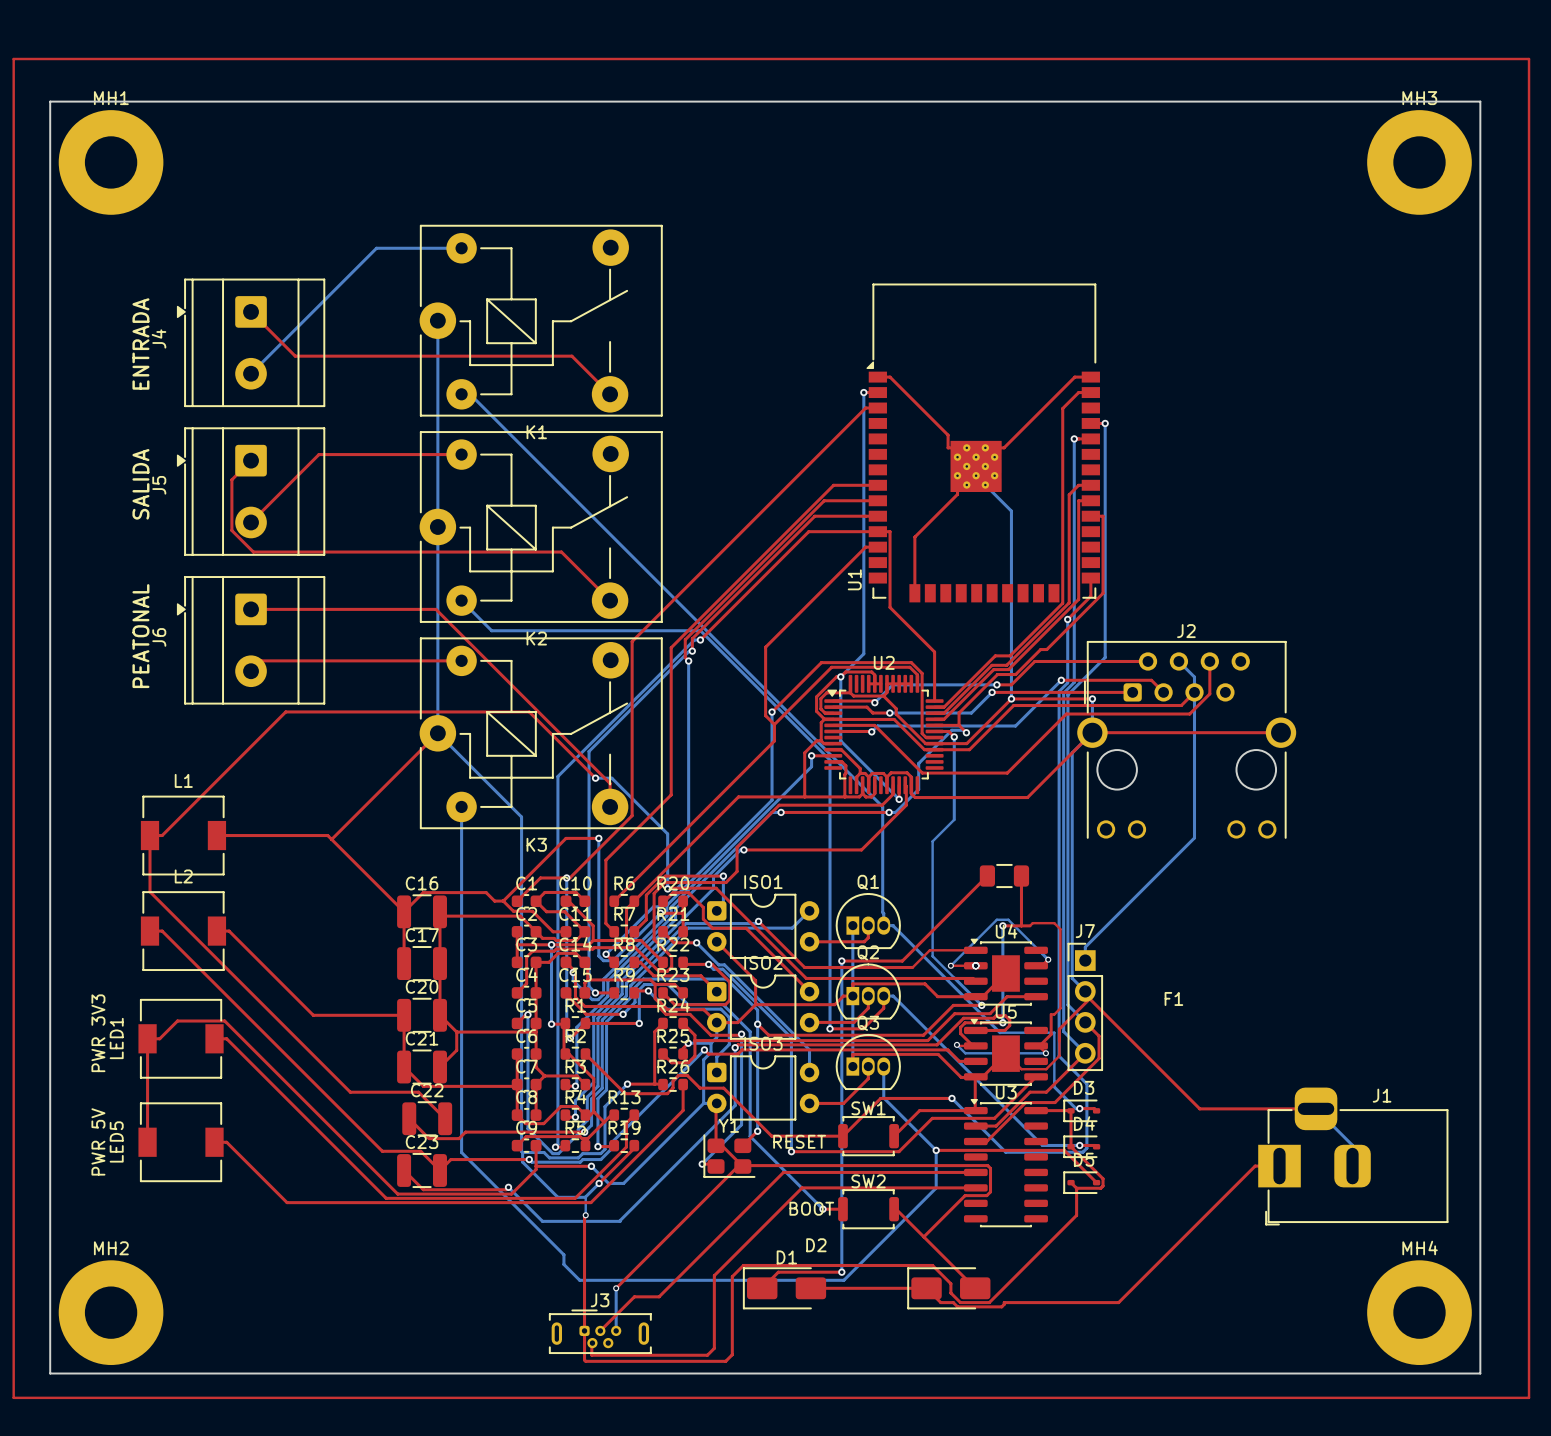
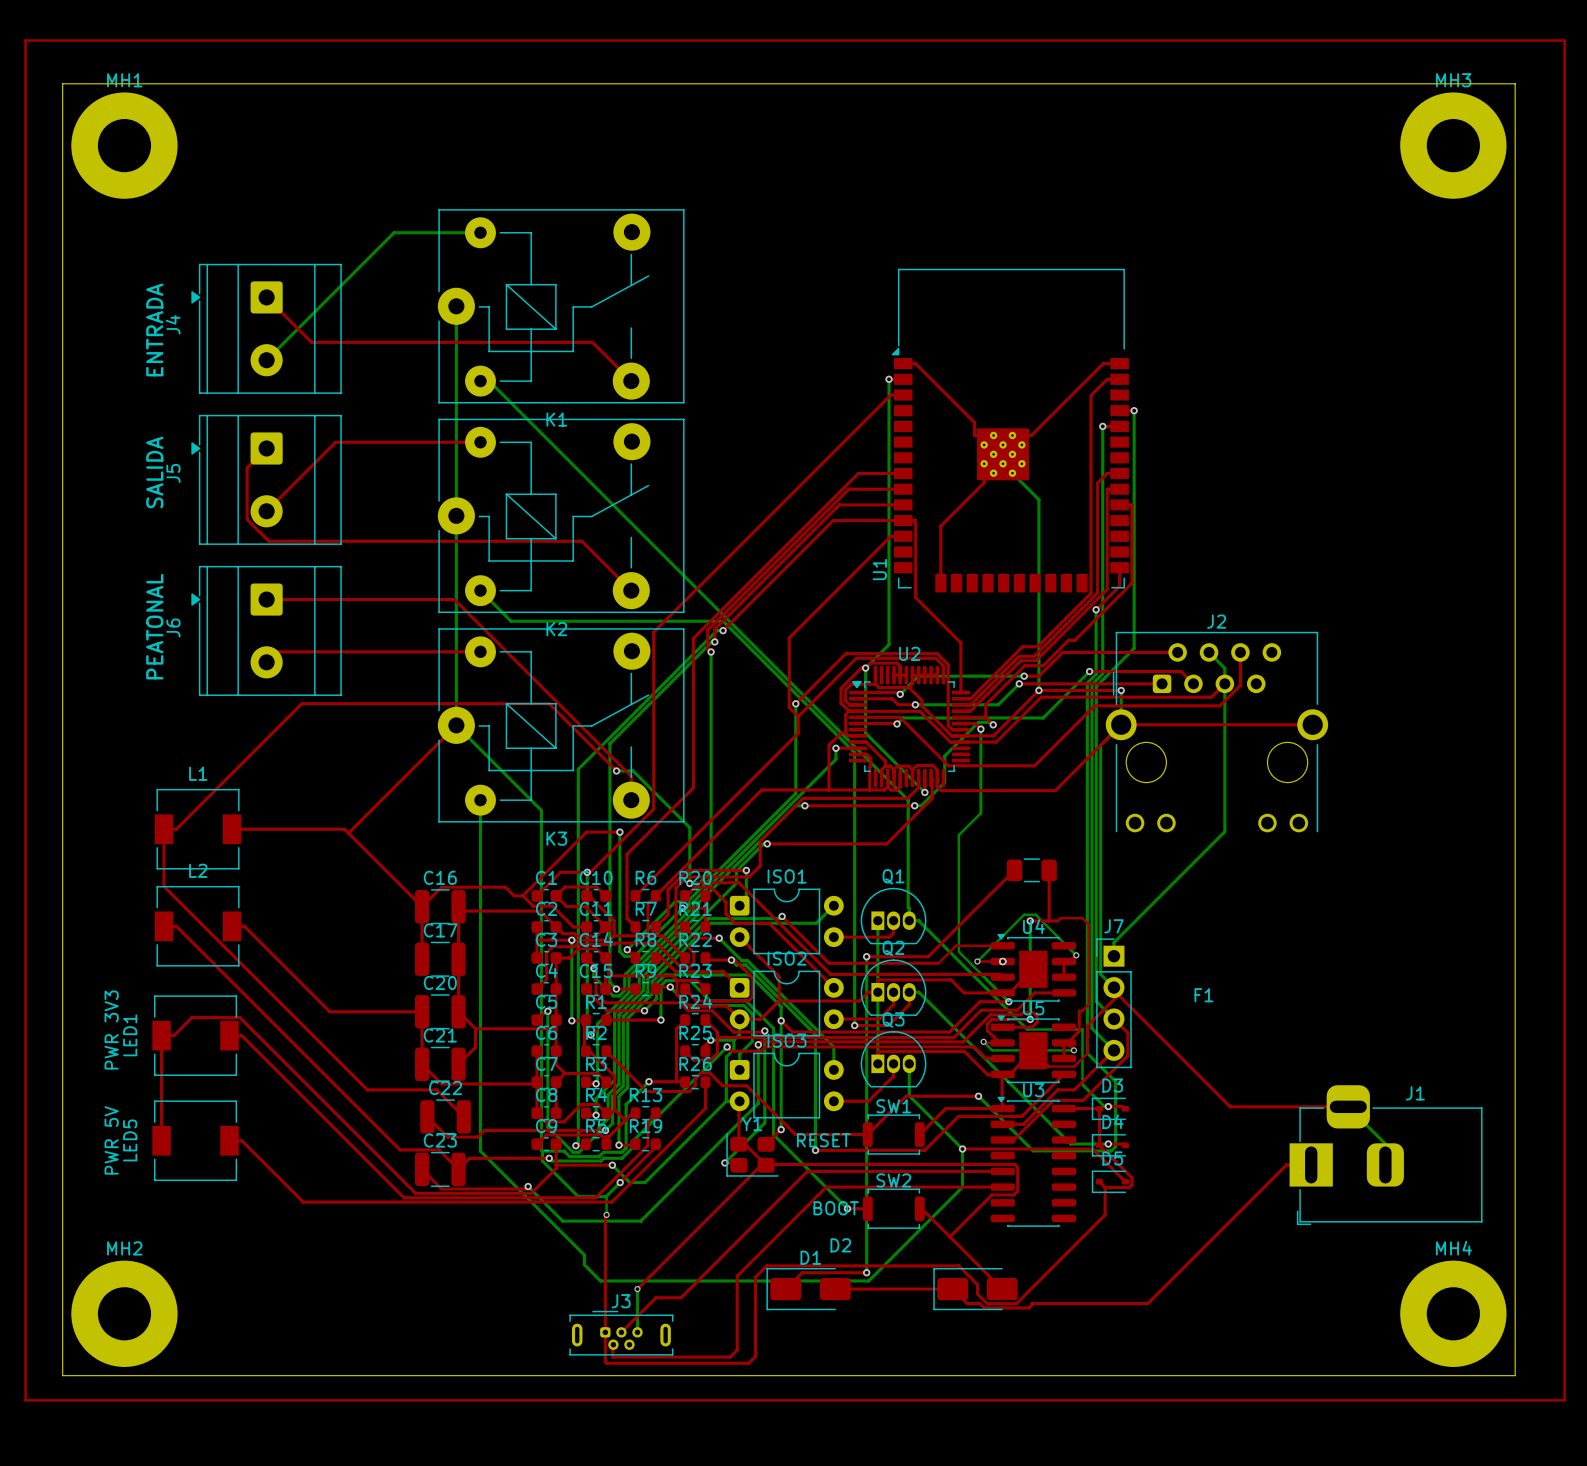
top track: none -> (1063, 961) (1063, 977)
top track: none -> (1063, 1042) (1063, 1058)

